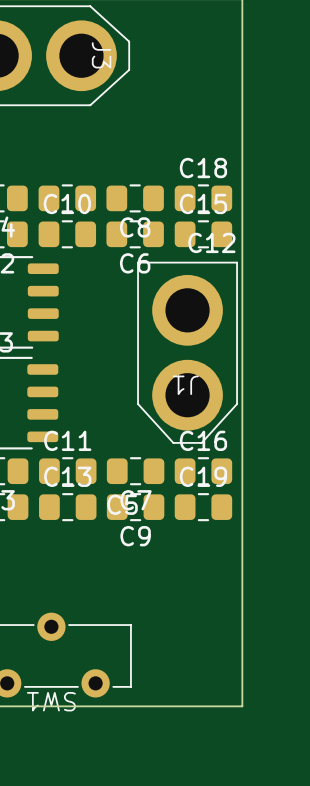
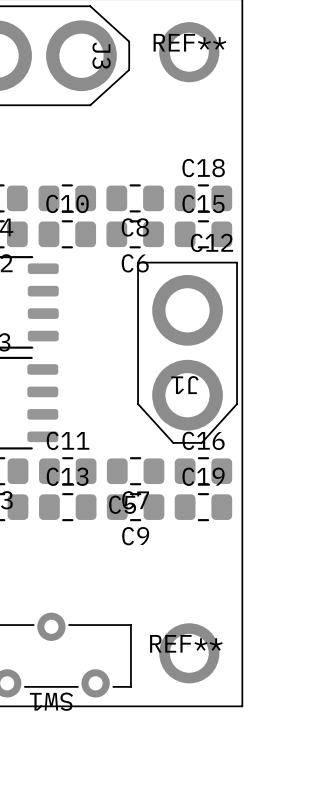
REF**: none -> (189, 52)
REF**: none -> (189, 653)

